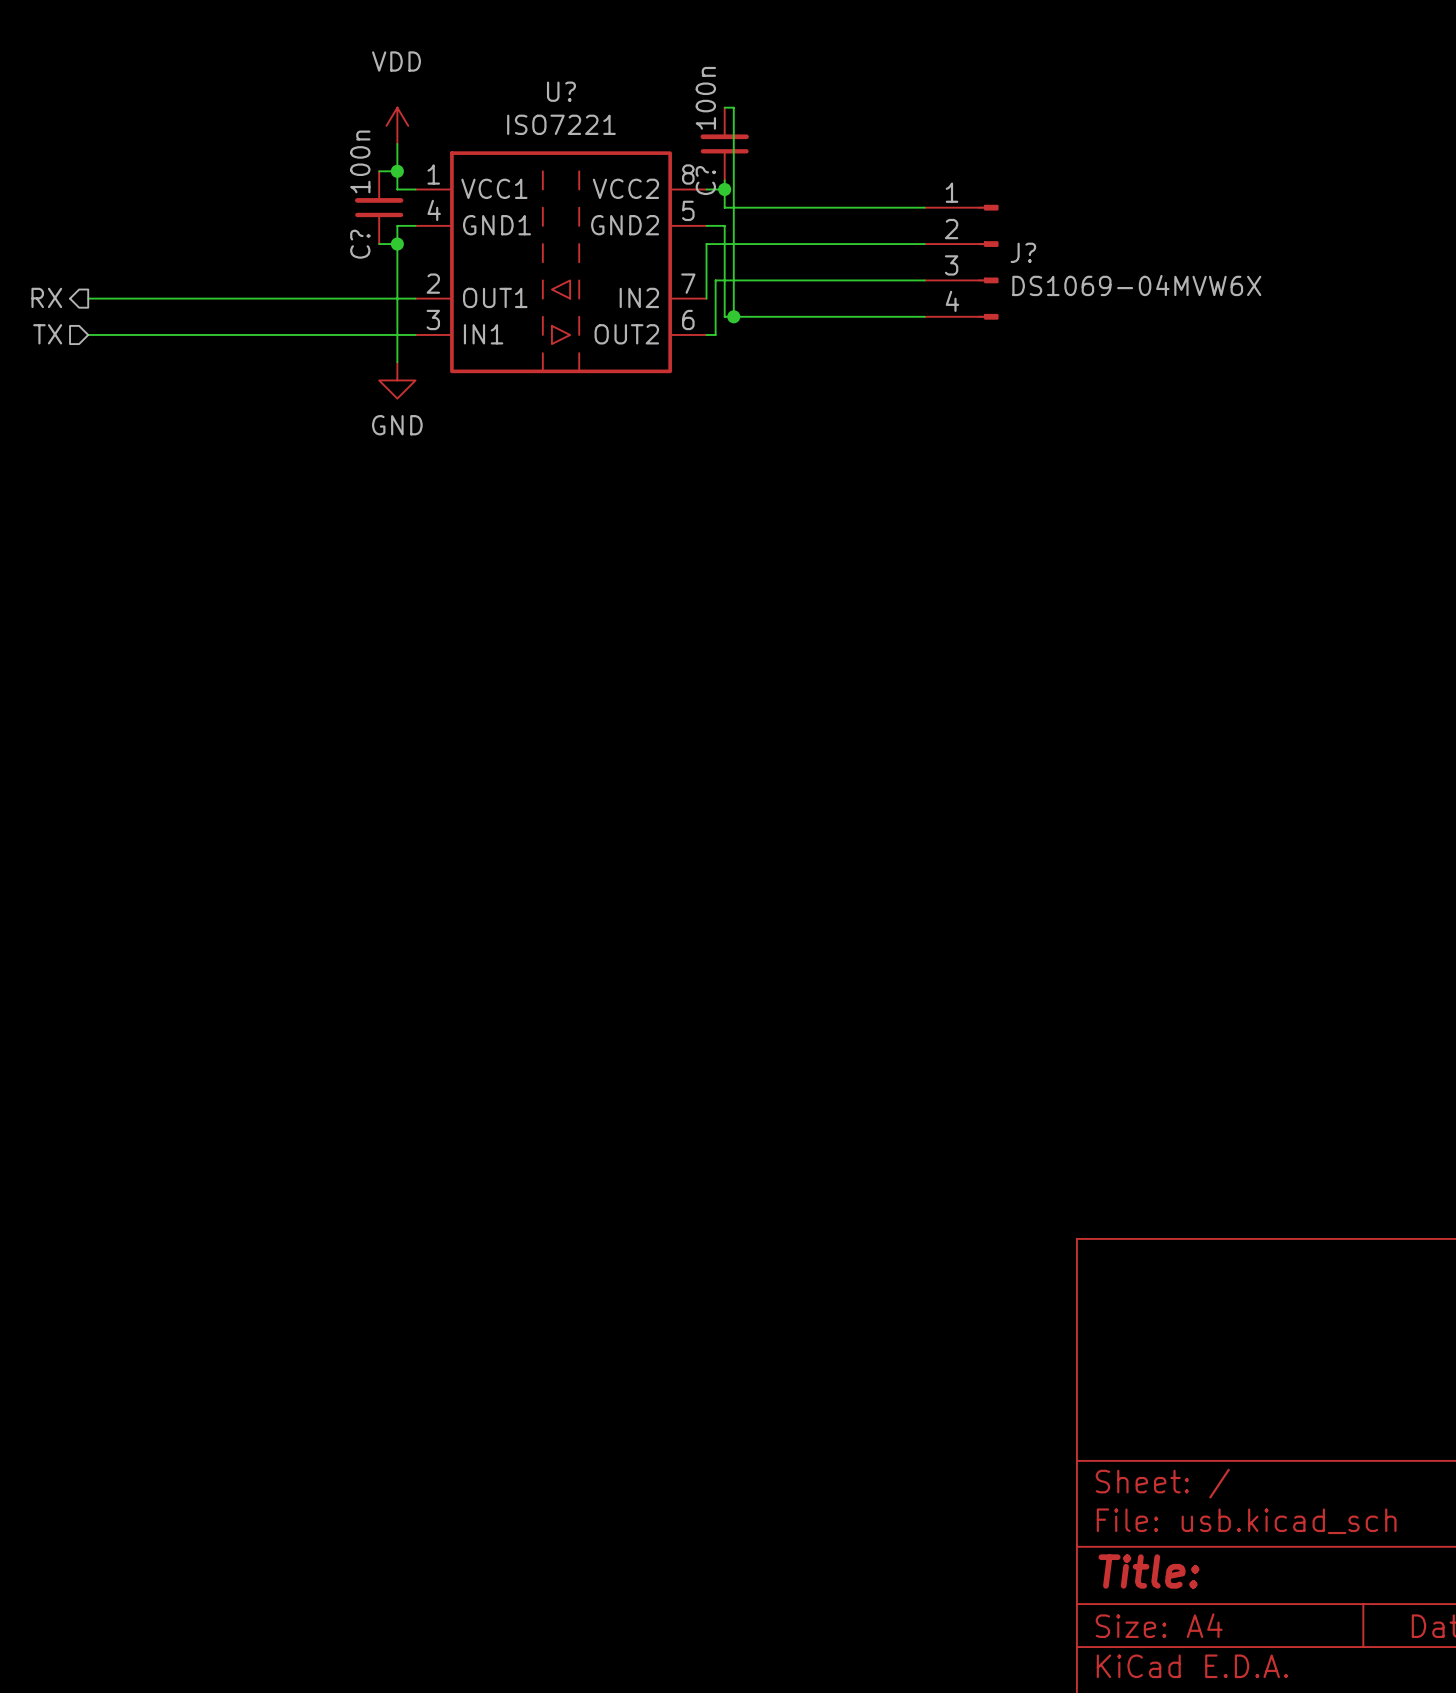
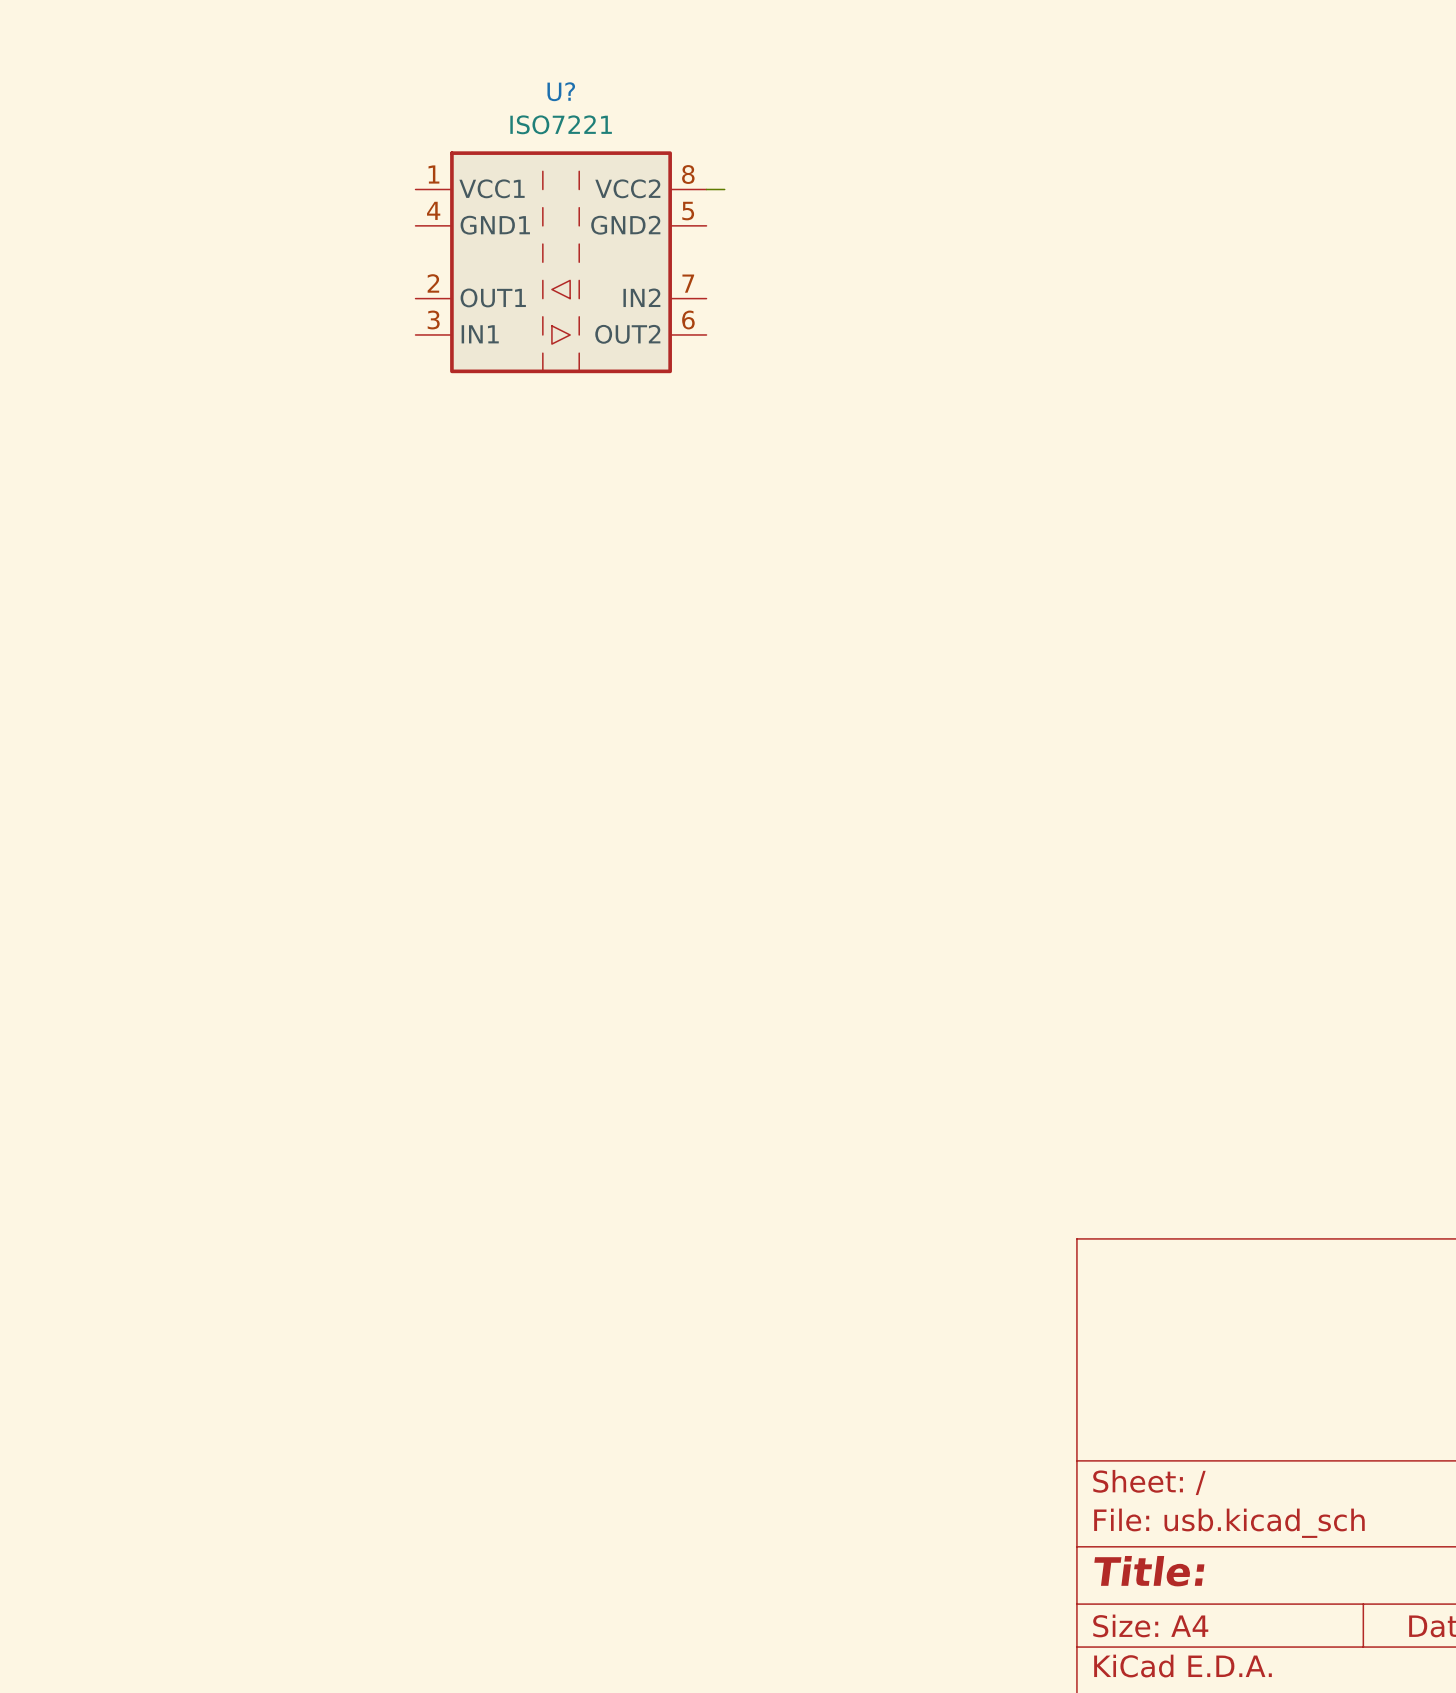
wire: (724, 107) (733, 107) (733, 316) -> none
power symbol: VDD (397, 125) -> none
wire: (397, 144) (397, 189) (415, 189) -> none
C?: 100n (724, 144) -> none
wire: (379, 171) (397, 171) -> none
junction: (397, 171) -> none
wire: (724, 180) (724, 207) (924, 207) -> none
junction: (724, 189) -> none
C?: 100n (379, 207) -> none
wire: (415, 225) (397, 225) (397, 362) -> none
wire: (706, 225) (724, 225) (724, 316) (924, 316) -> none
wire: (379, 244) (397, 244) -> none
junction: (397, 244) -> none
wire: (924, 244) (706, 244) (706, 298) -> none
J?: DS1069-04MVW6X (961, 262) -> none
wire: (924, 280) (715, 280) (715, 334) (706, 334) -> none
hierarchical label: RX (46, 297) -> none
wire: (88, 298) (415, 298) -> none
junction: (733, 316) -> none
hierarchical label: TX (47, 334) -> none
wire: (88, 334) (415, 334) -> none
power symbol: GND (397, 380) -> none

